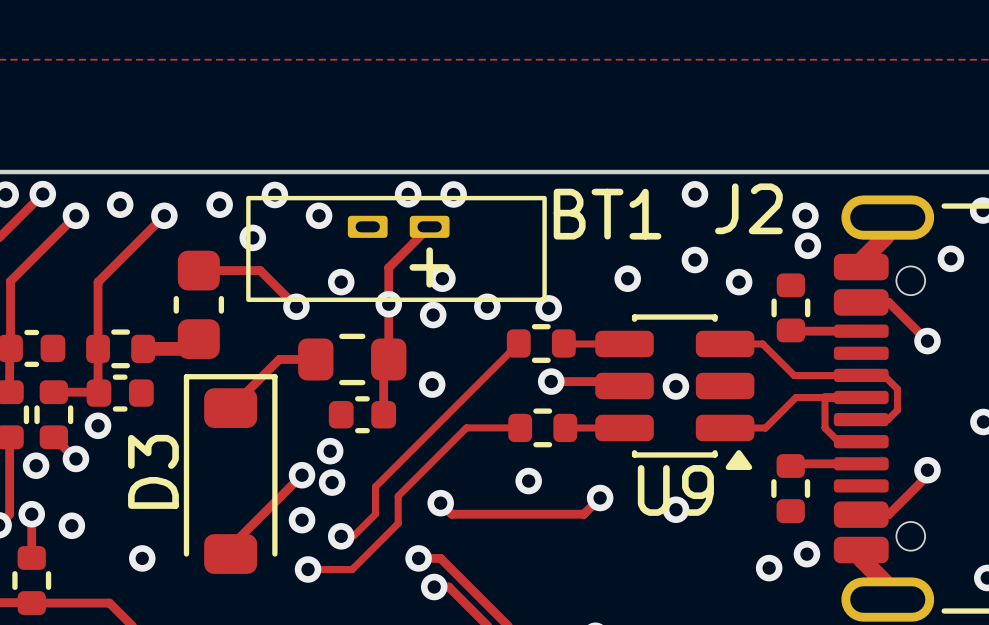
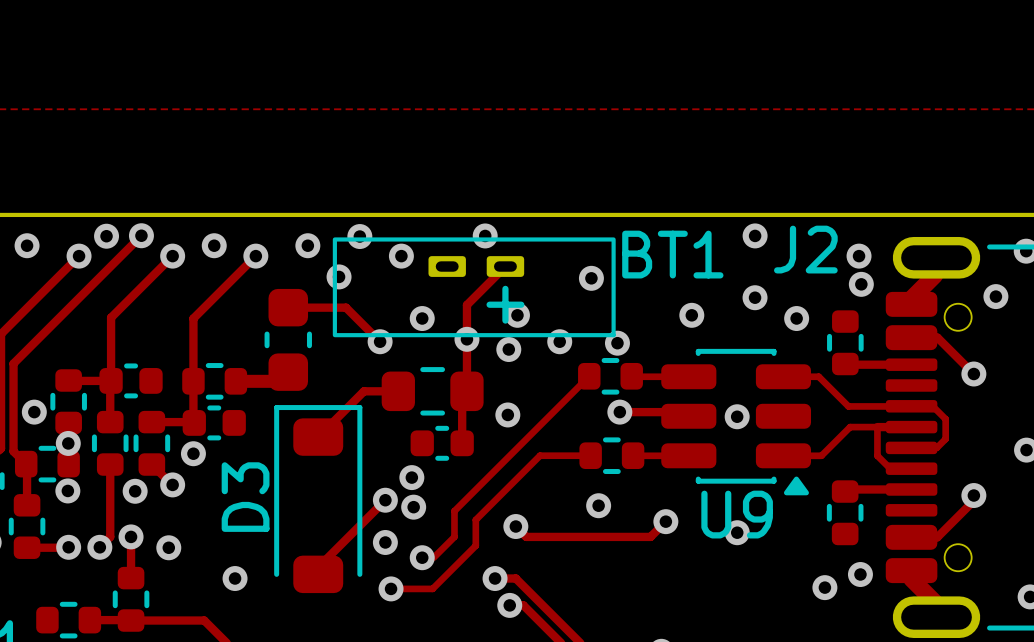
via position: (453, 194) -> (591, 278)

